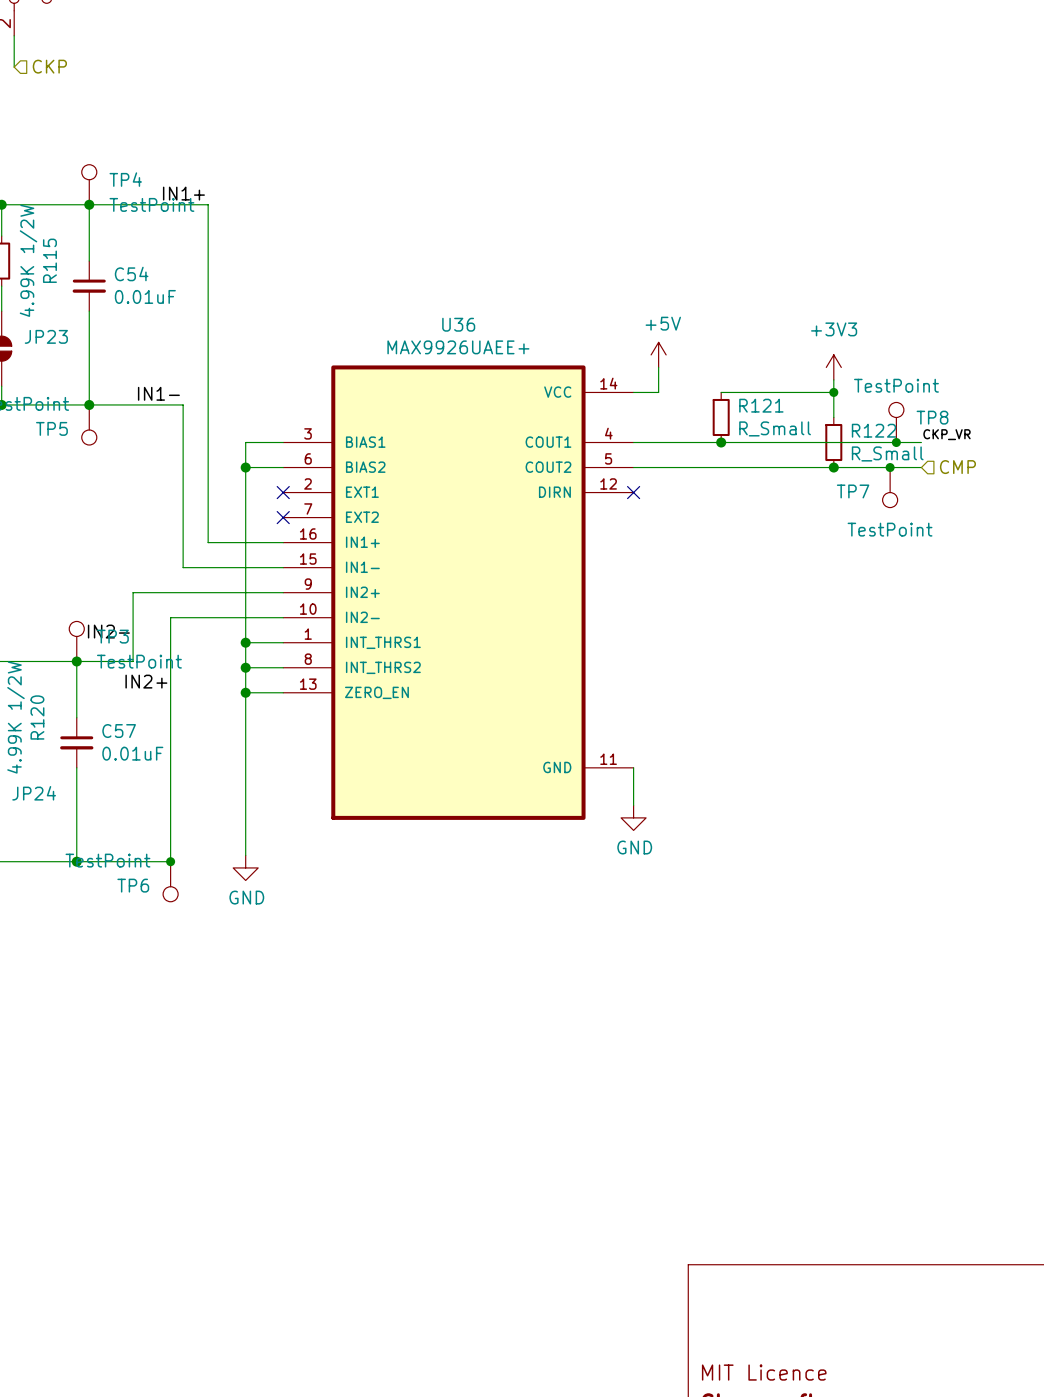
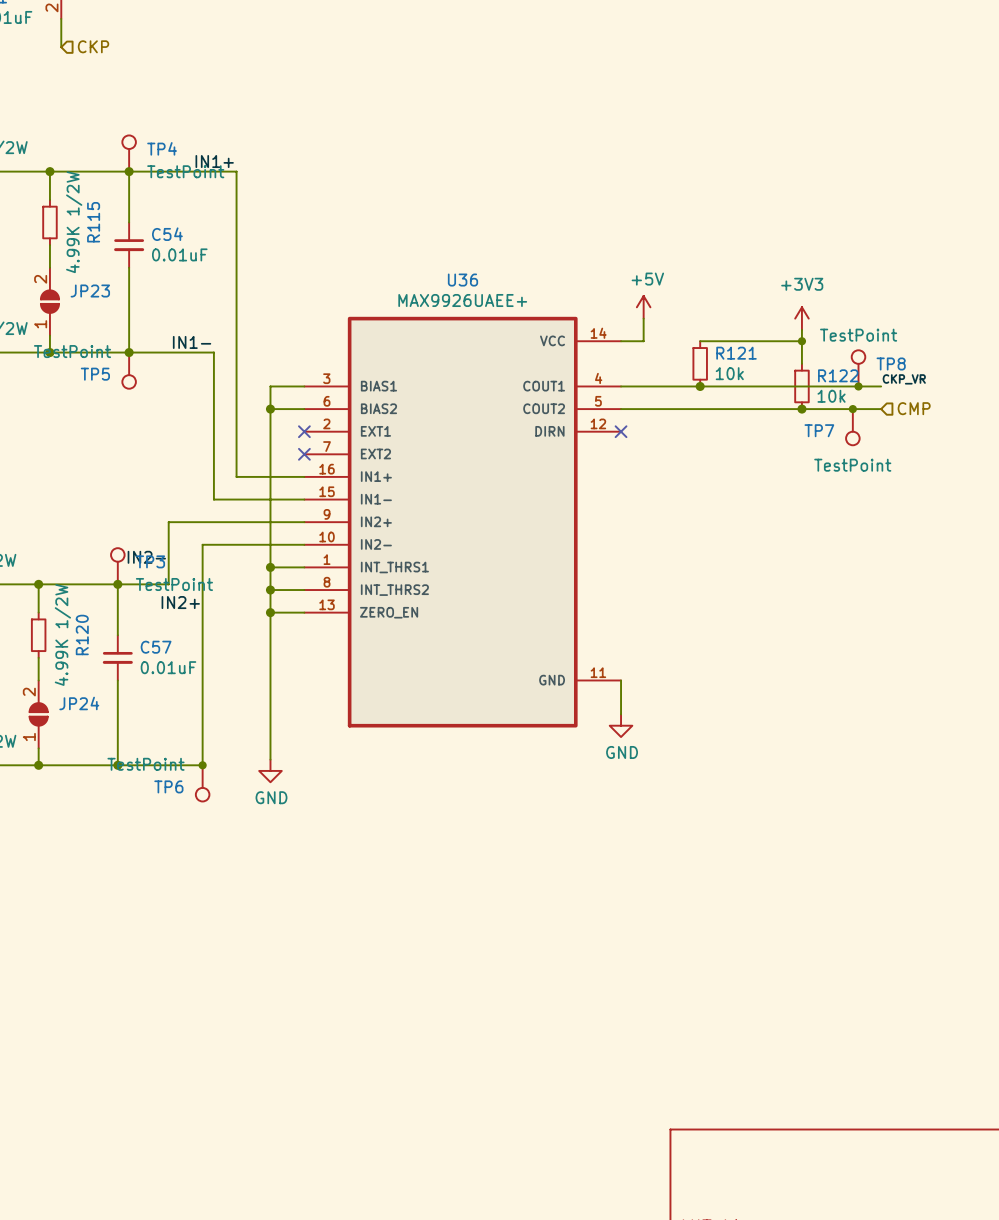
R121 value: R_Small (775, 428) -> 10k (729, 373)
R122 value: R_Small (887, 453) -> 10k (831, 396)

